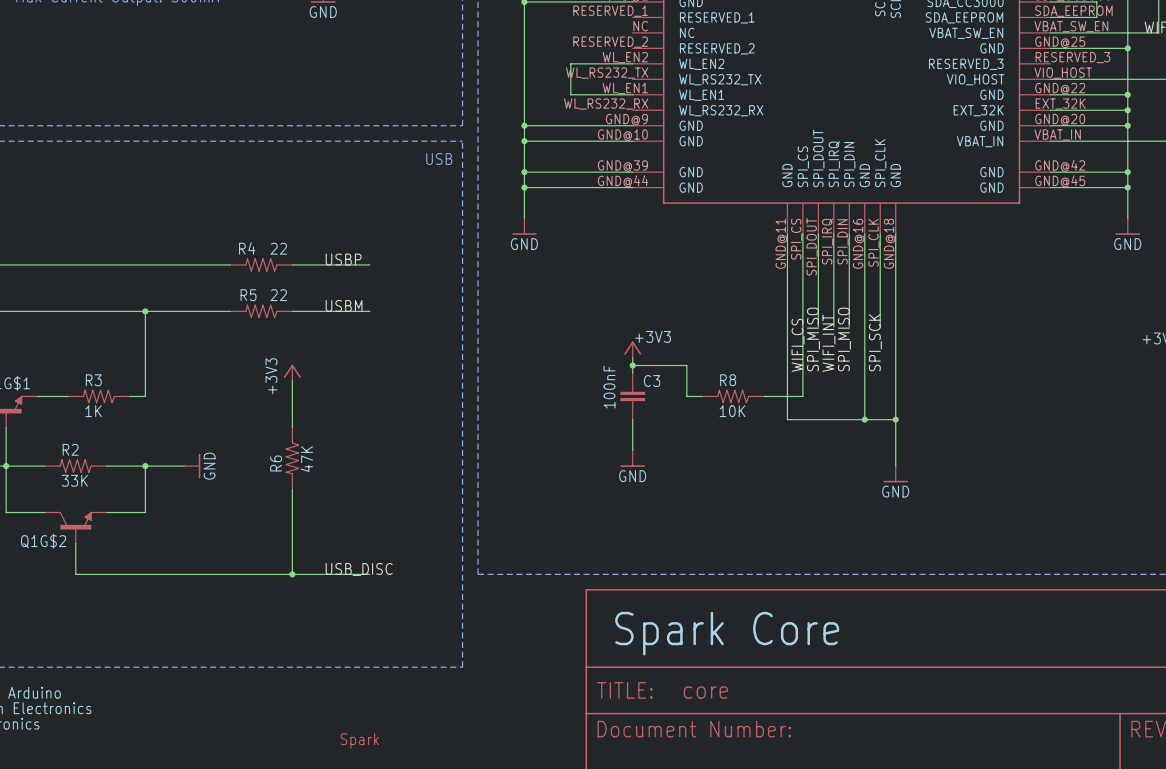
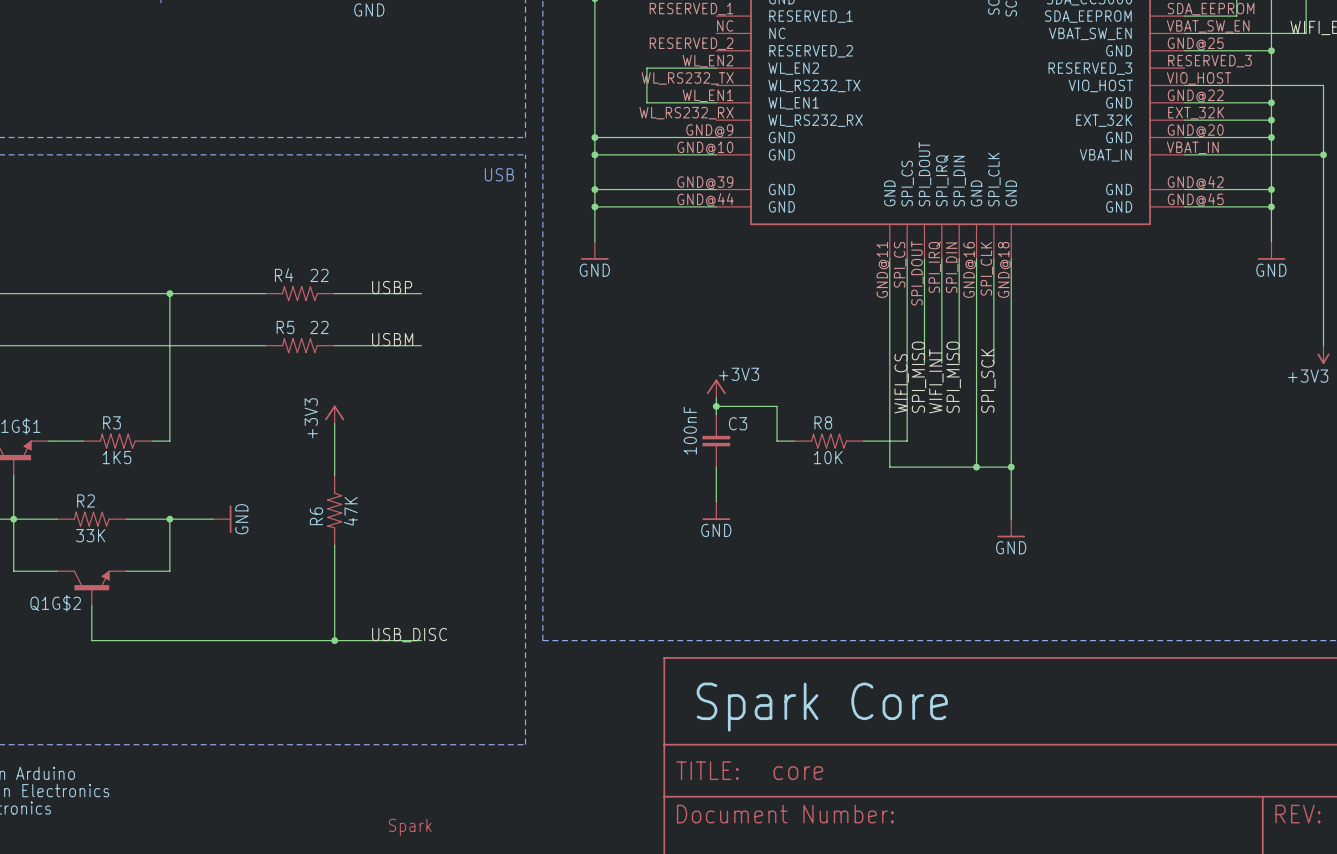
wire: none -> (169, 293) (169, 345)
junction: none -> (169, 293)
junction: (145, 311) -> none
R3 value: 1K (93, 411) -> 1K5 (116, 457)

